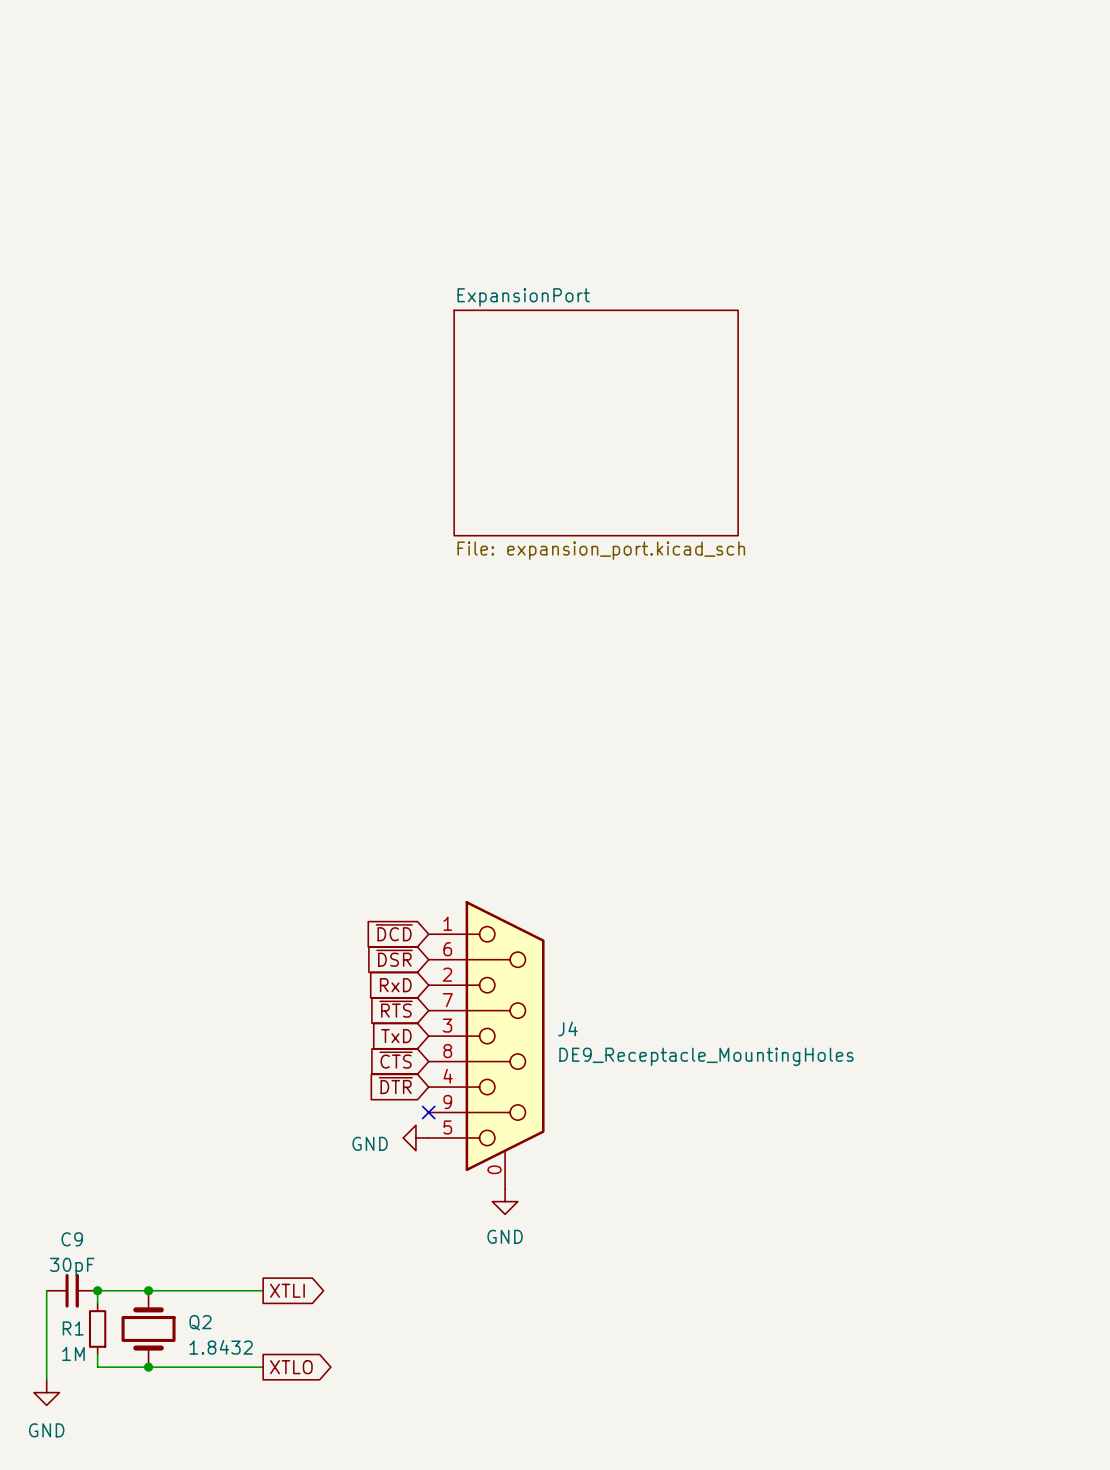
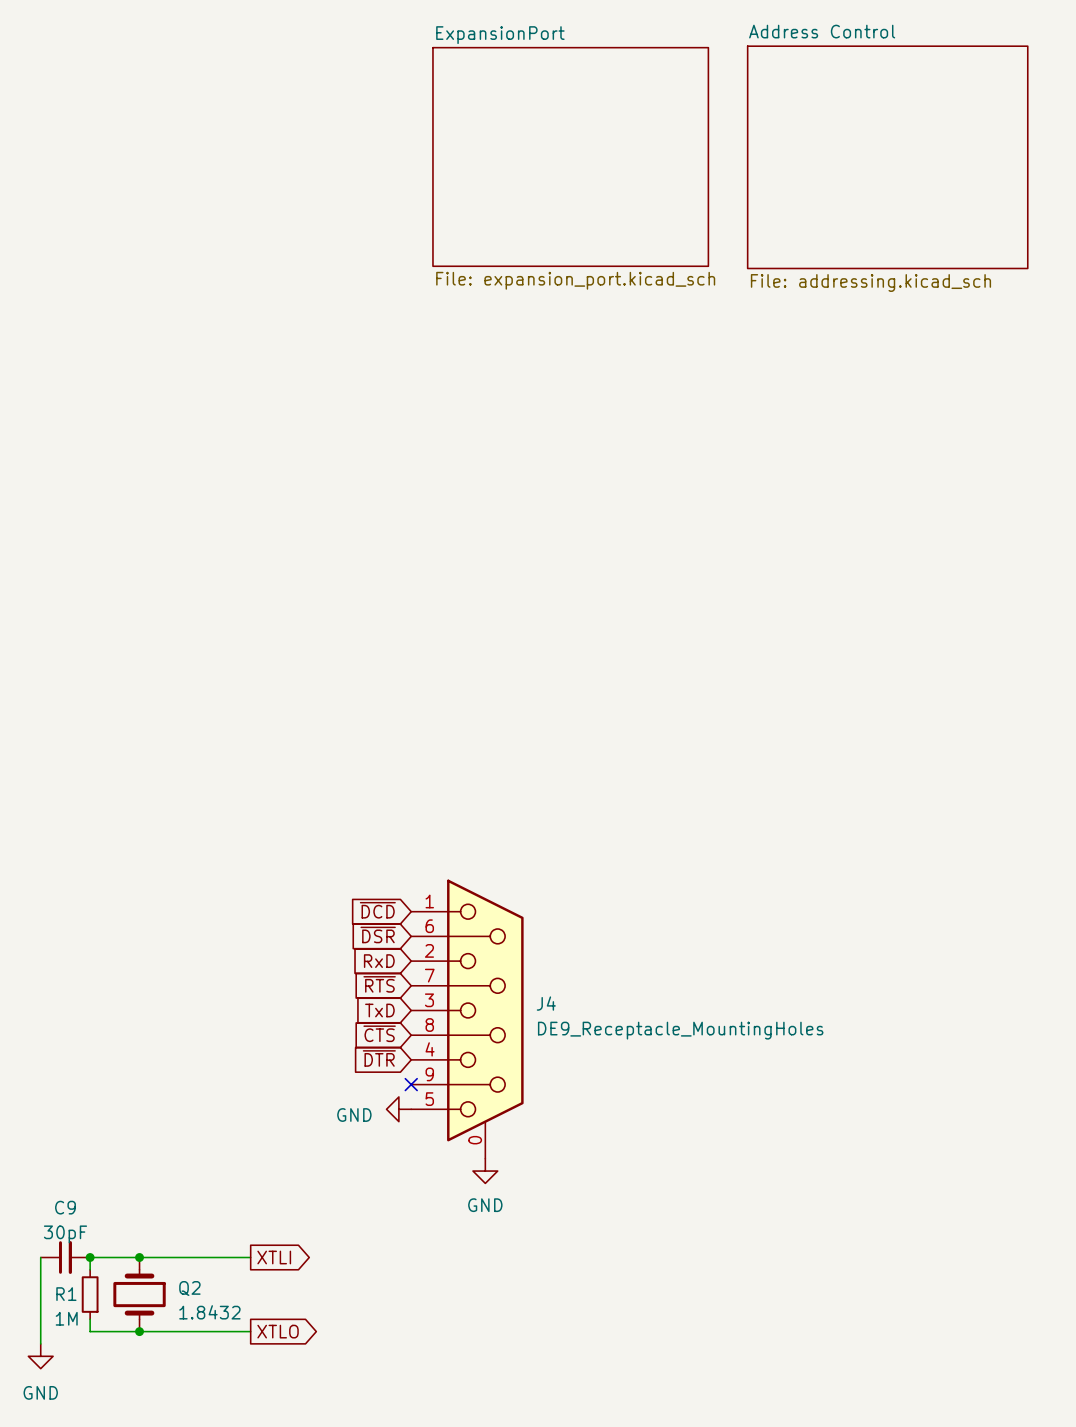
sheet ExpansionPort: none -> File: expansion_port.kicad_sch (570, 156)
sheet Address Control: none -> File: addressing.kicad_sch (887, 157)
sheet ExpansionPort: File: expansion_port.kicad_sch (596, 423) -> none

